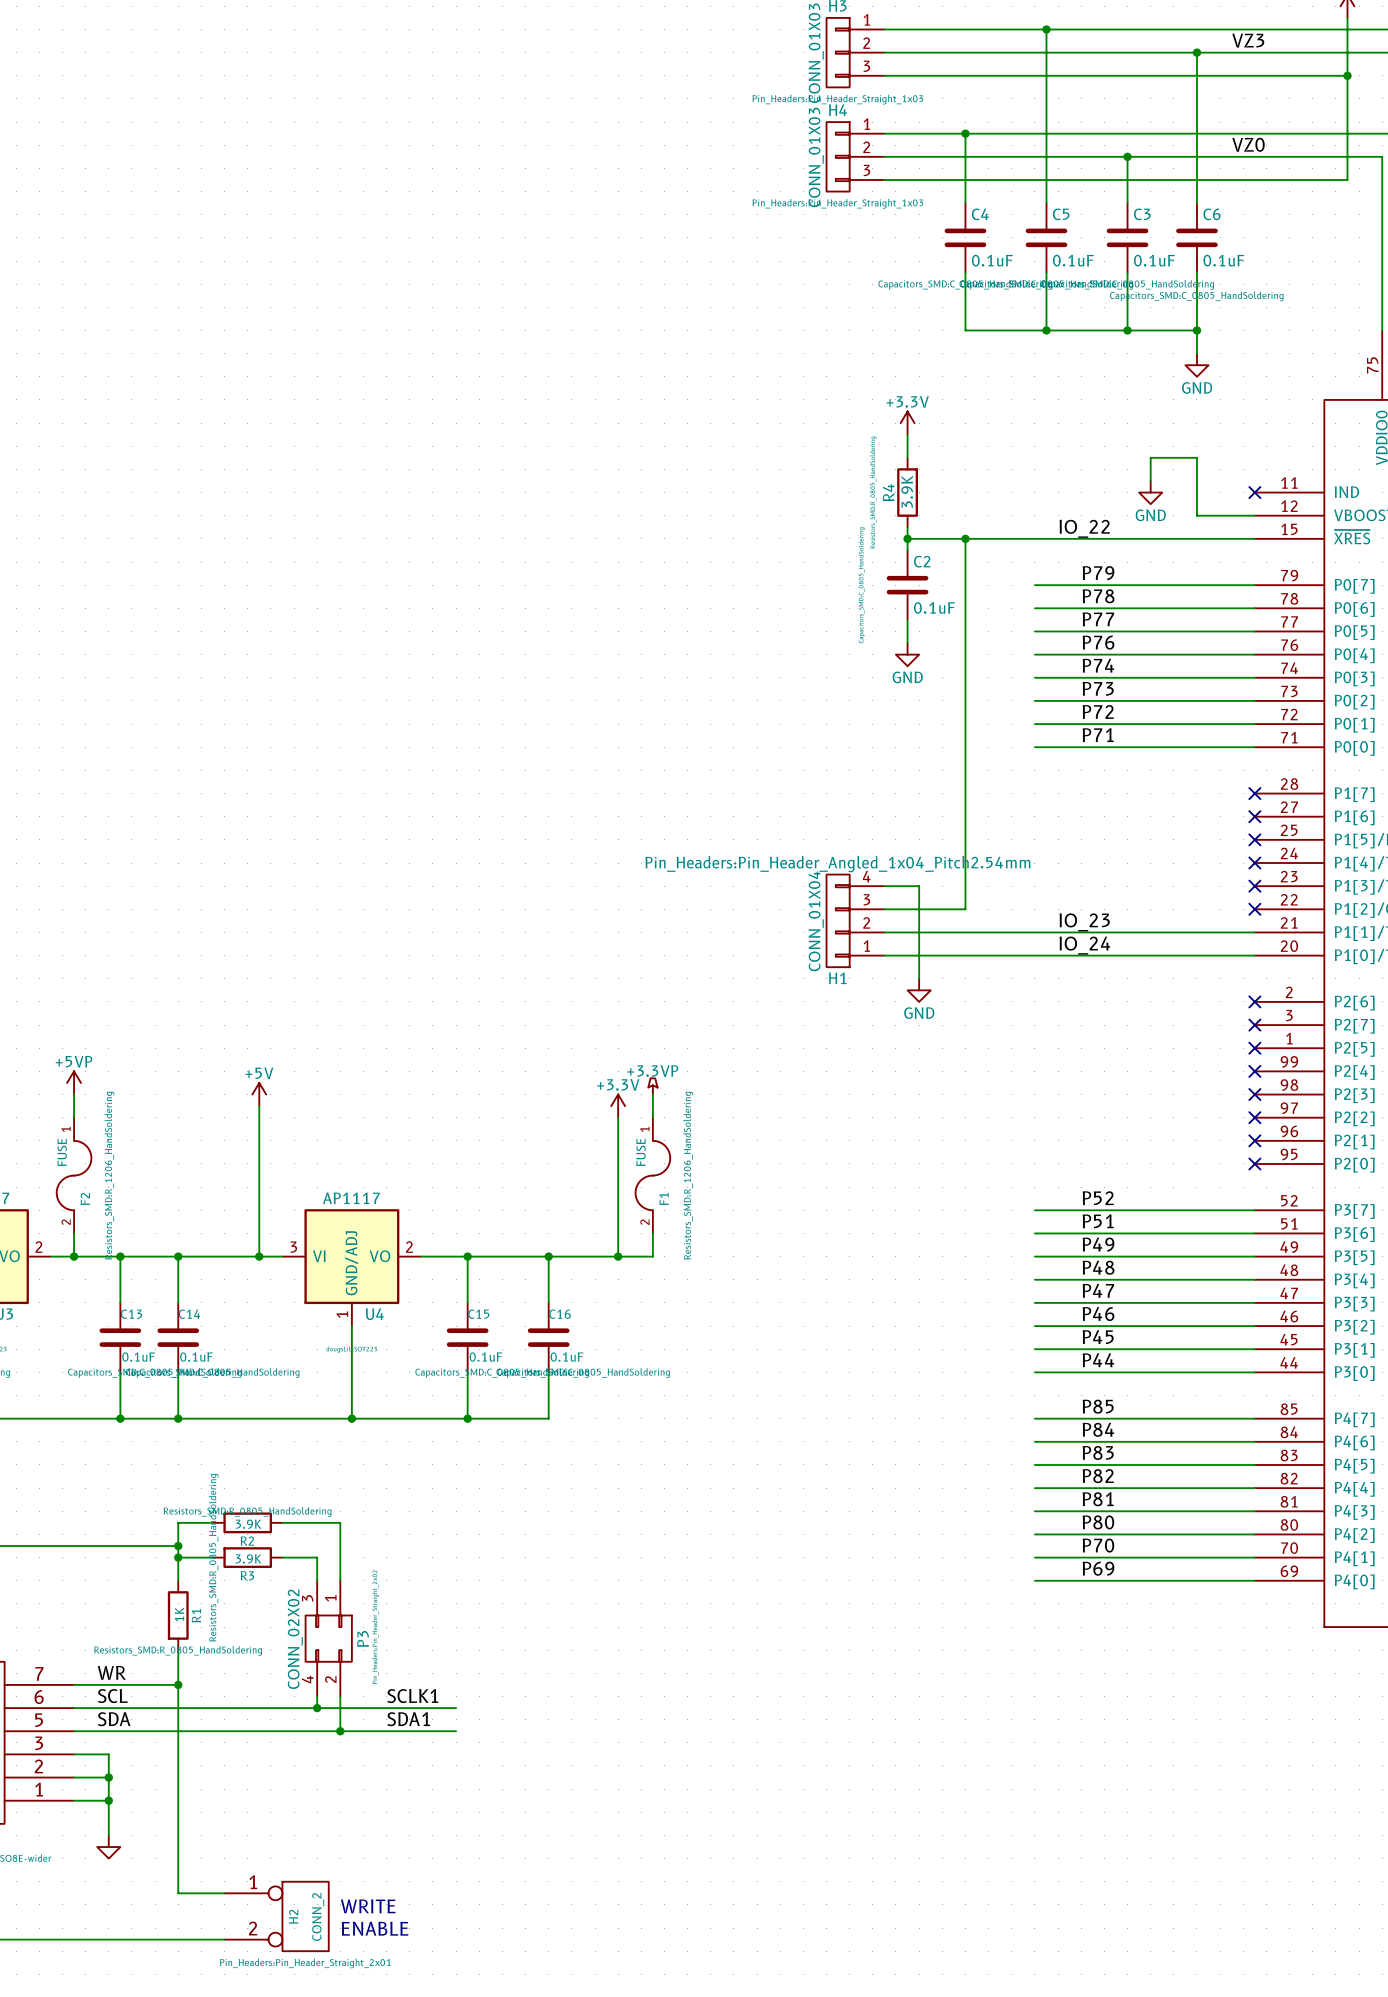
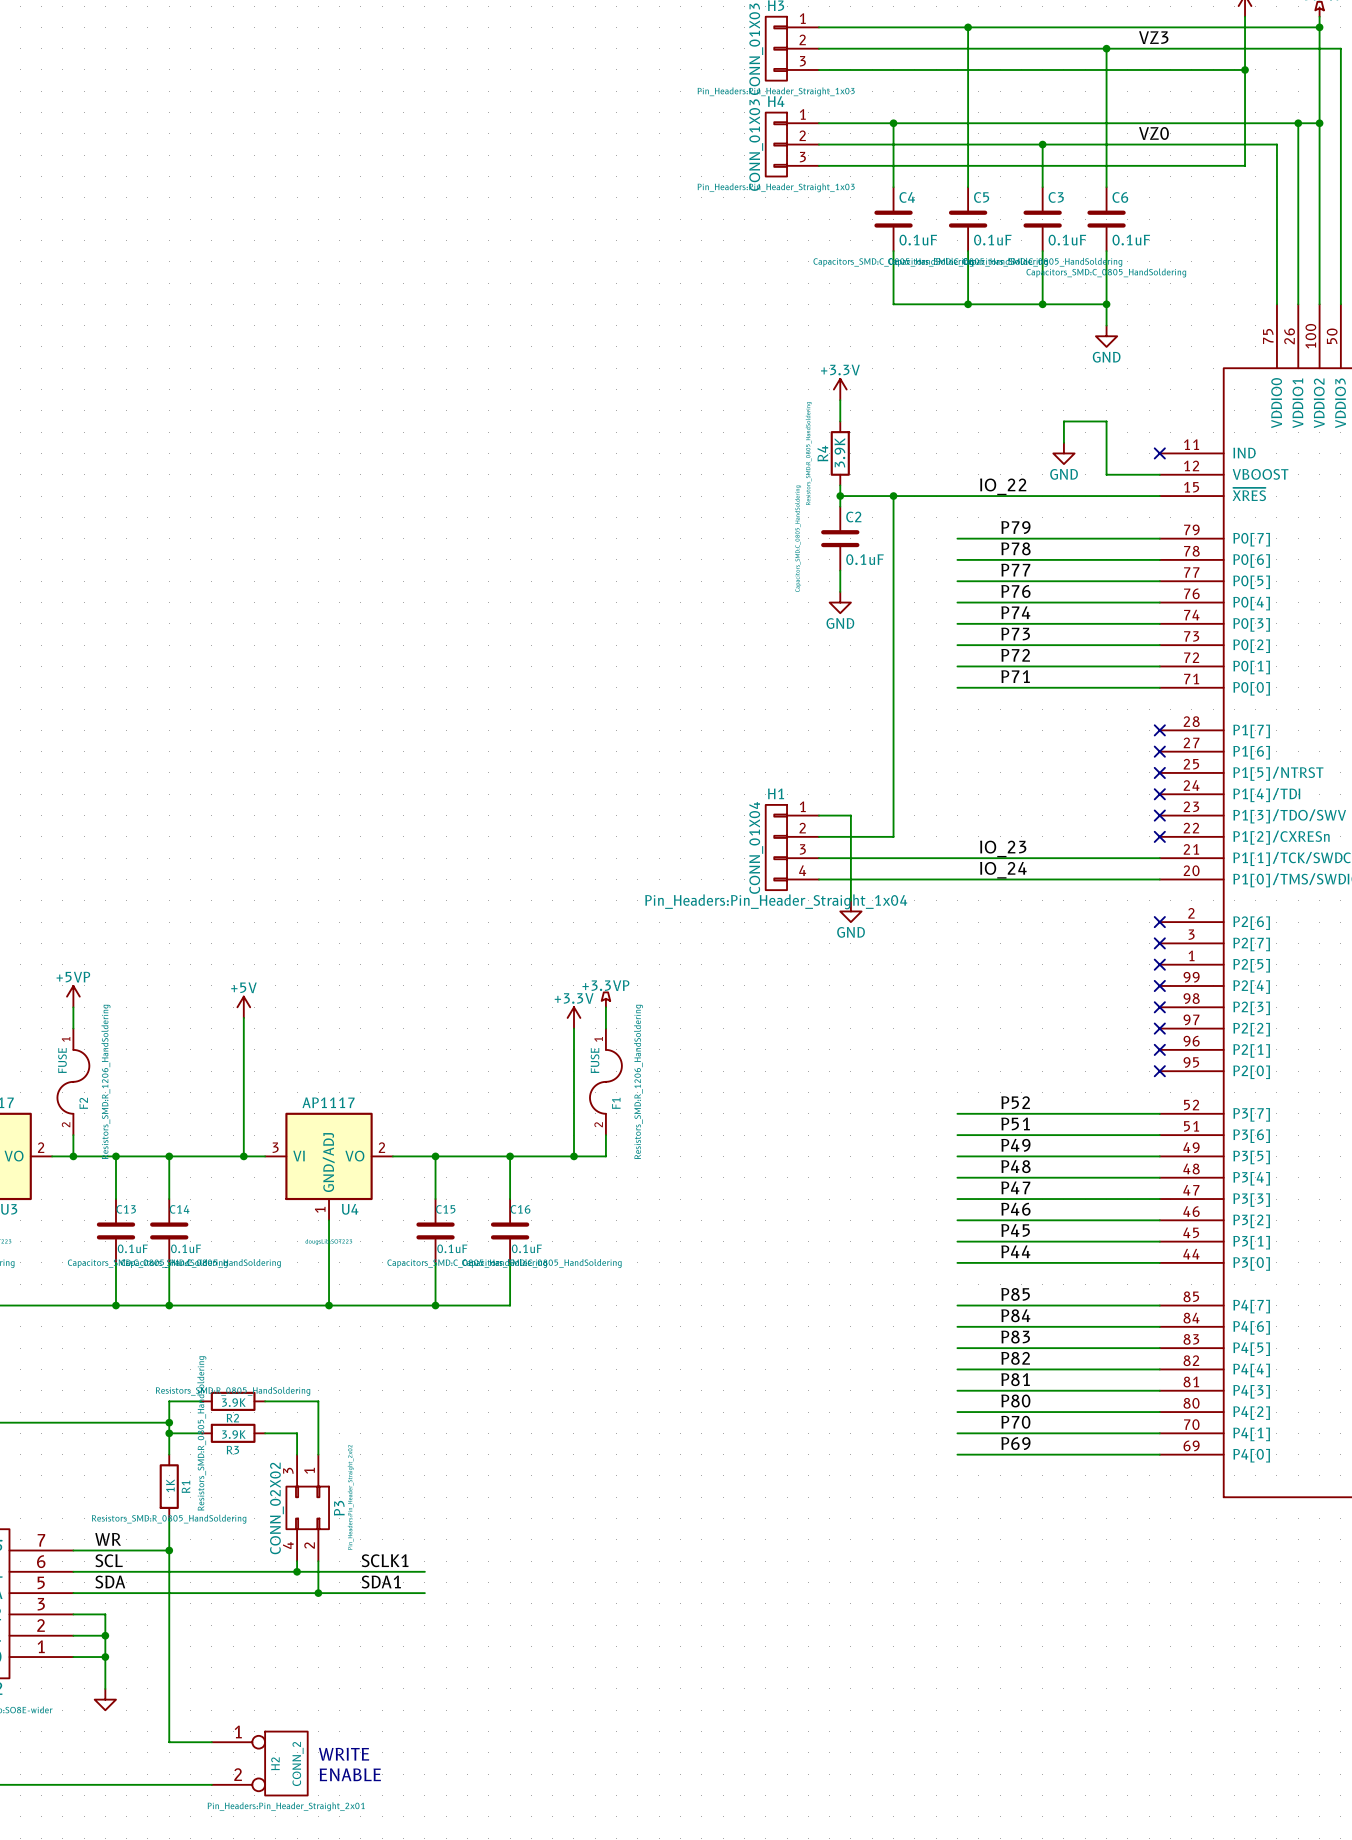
H1 text: Pin_Headers:Pin_Header_Angled_1x04_Pitch2.54mm (837, 864) -> Pin_Headers:Pin_Header_Straight_1x04 (776, 901)
H1 flip: as is (838, 920) -> up-down (776, 847)

